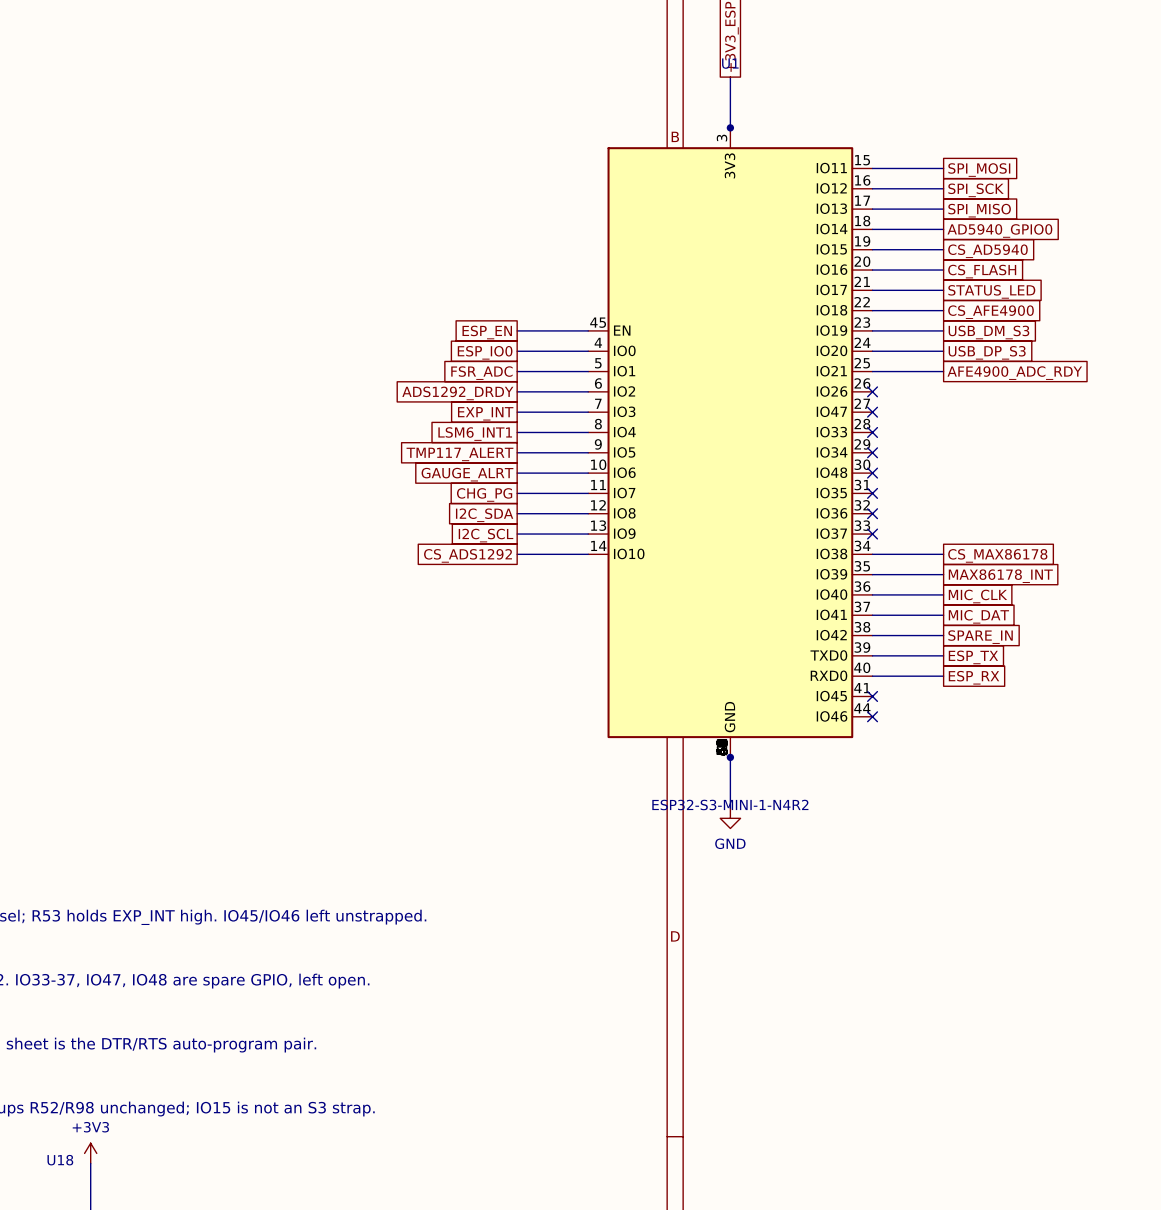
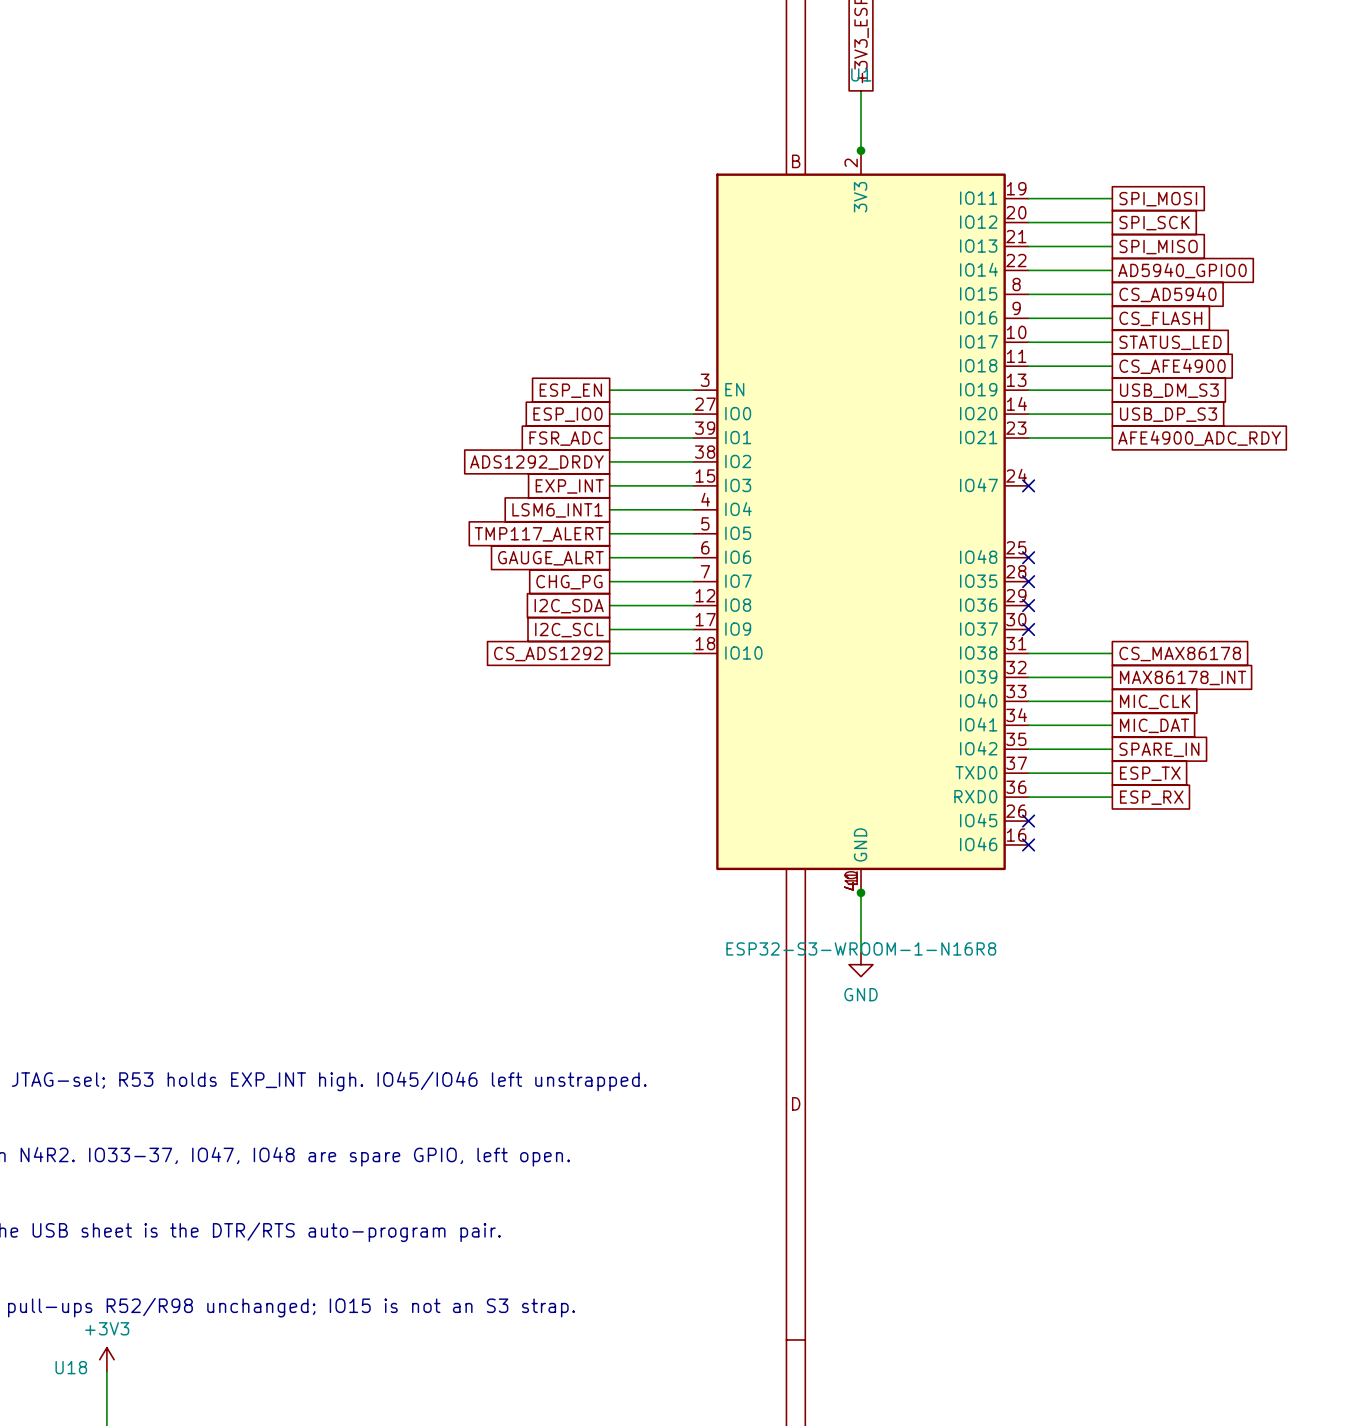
U1 symbol: [588, 127, 873, 758] -> [693, 150, 1029, 893]
no-connect mark: (872, 391) -> none
no-connect mark: (872, 432) -> none
no-connect mark: (872, 452) -> none
U1 value: ESP32-S3-MINI-1-N4R2 (730, 805) -> ESP32-S3-WROOM-1-N16R8 (861, 948)

